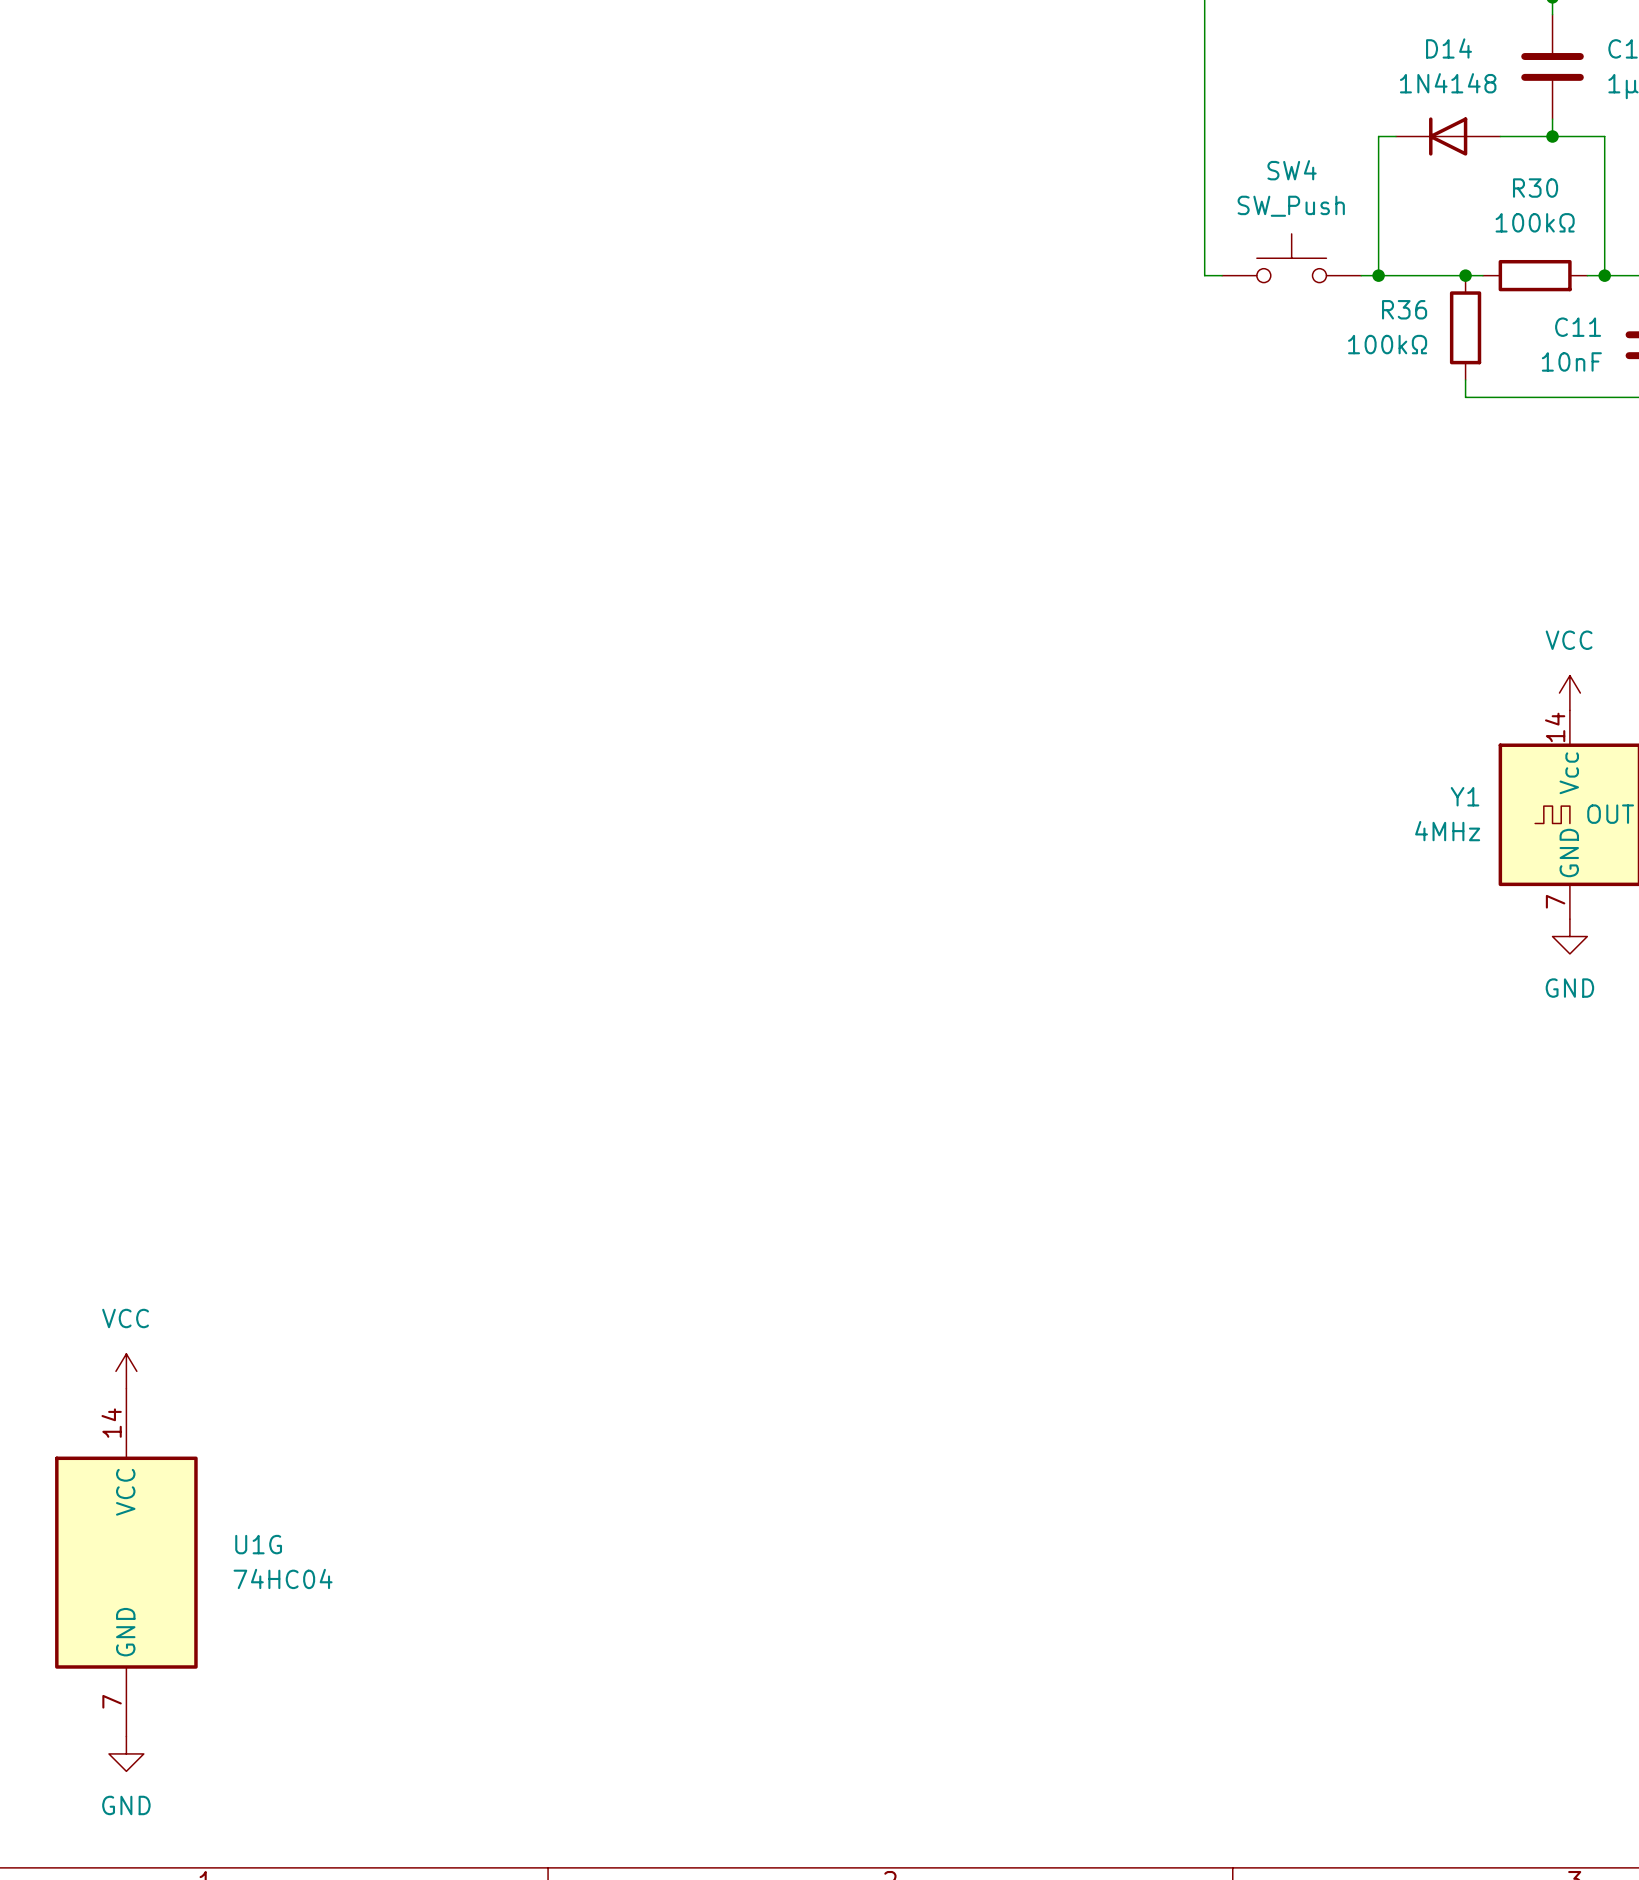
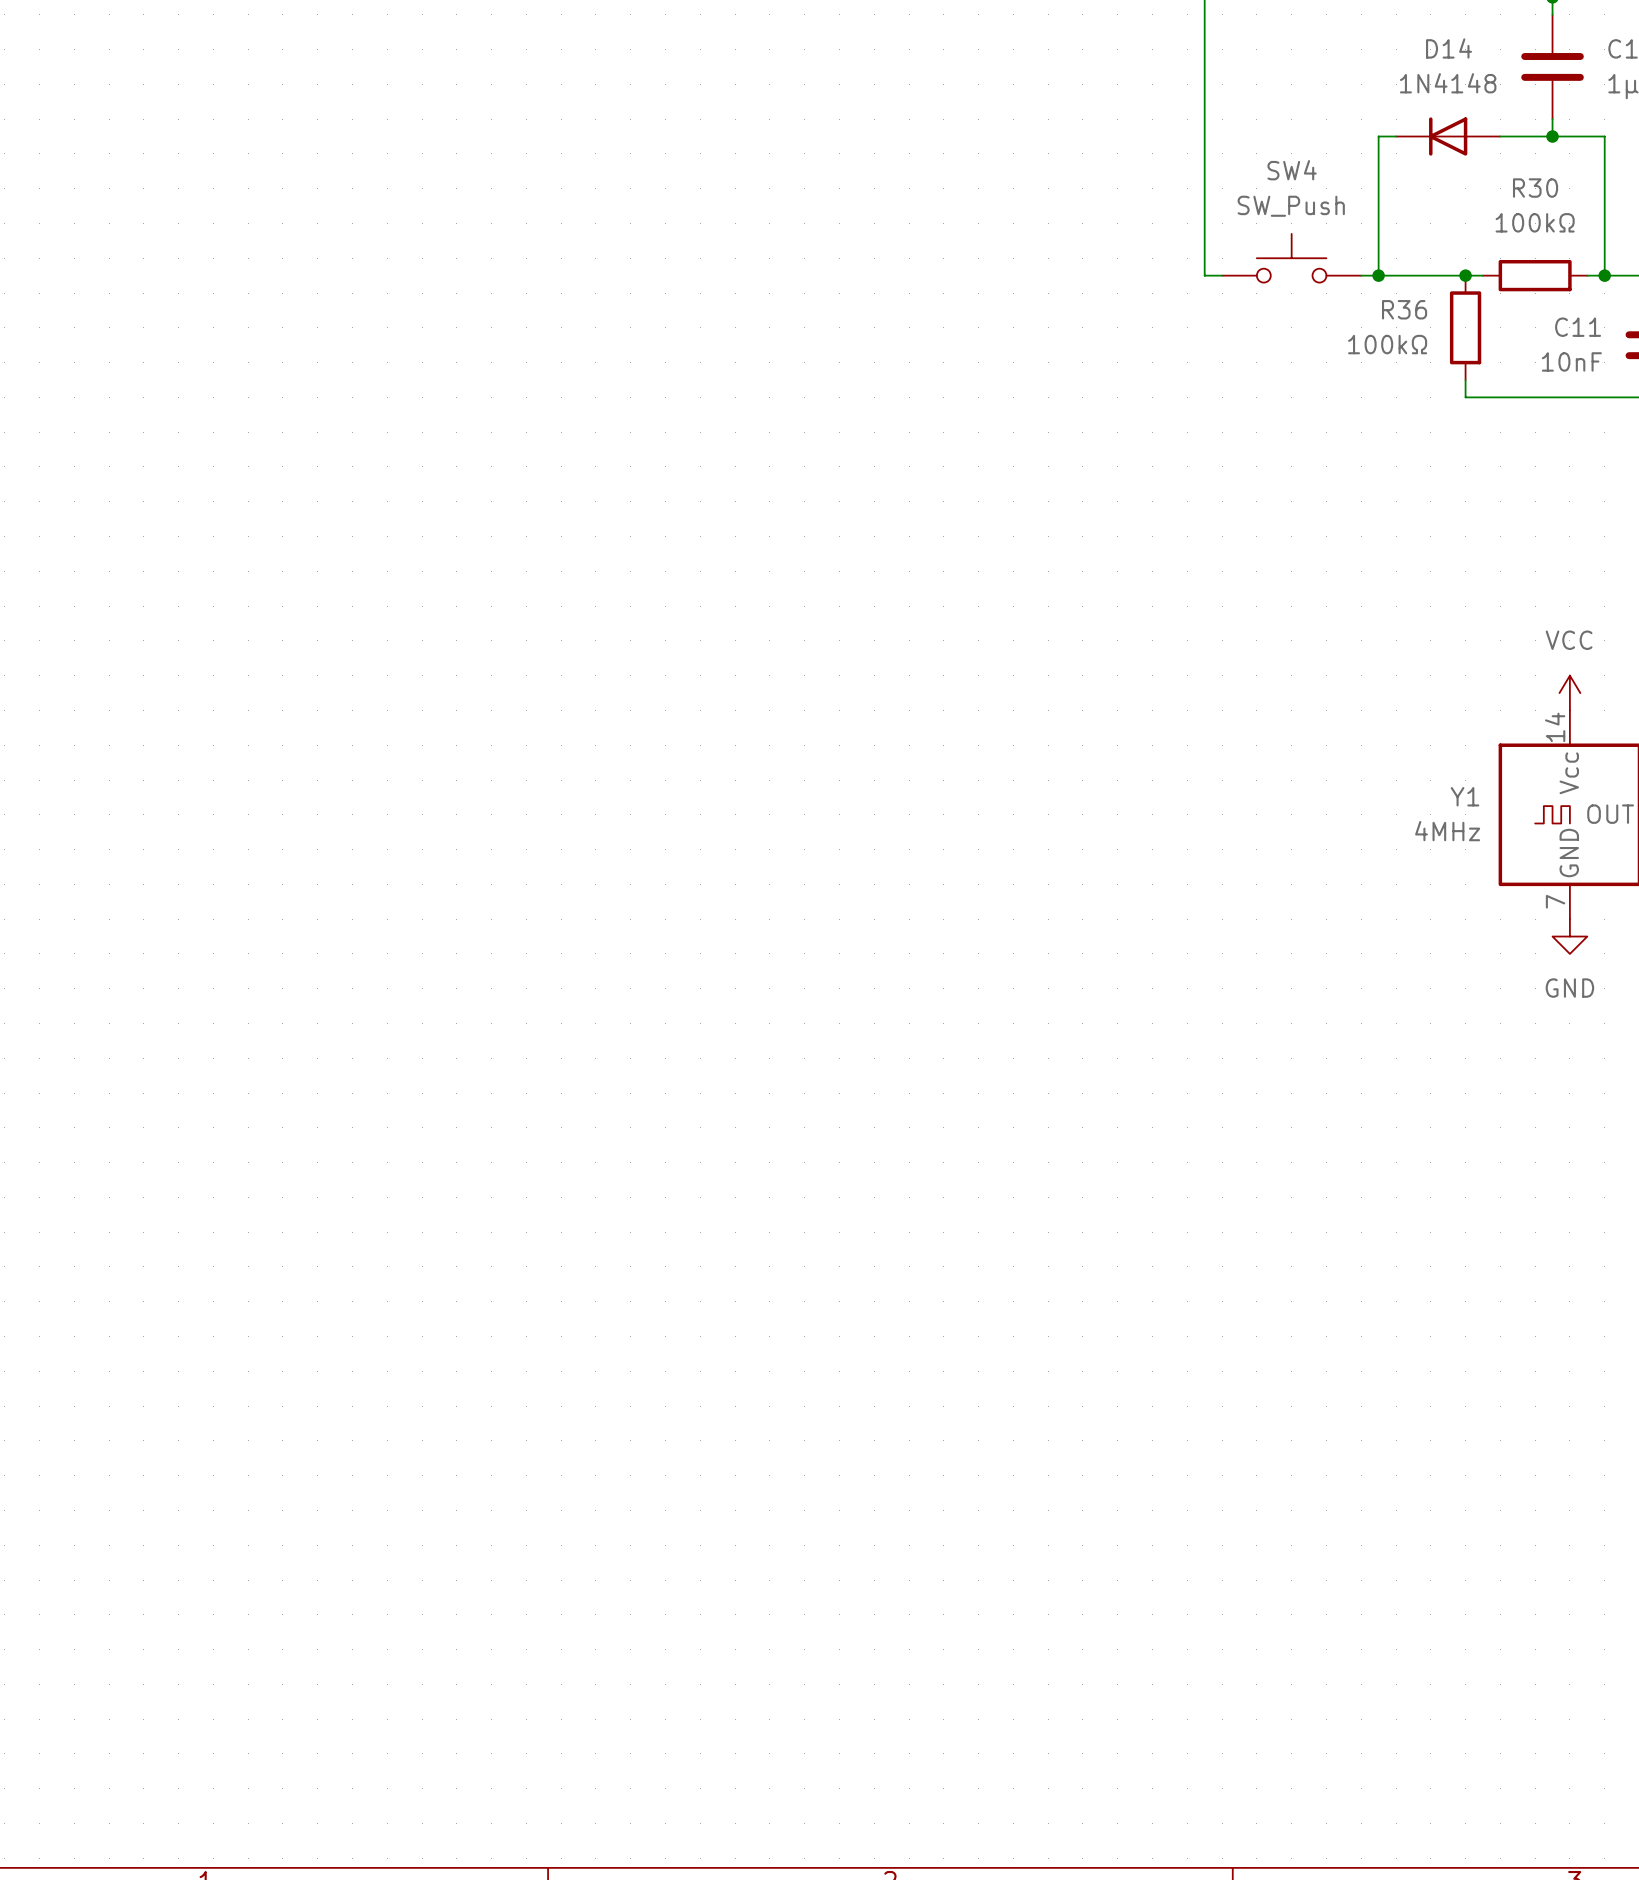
power symbol: VCC (126, 1371) -> none
U1G: 74HC04 (126, 1562) -> none
power symbol: GND (126, 1753) -> none

